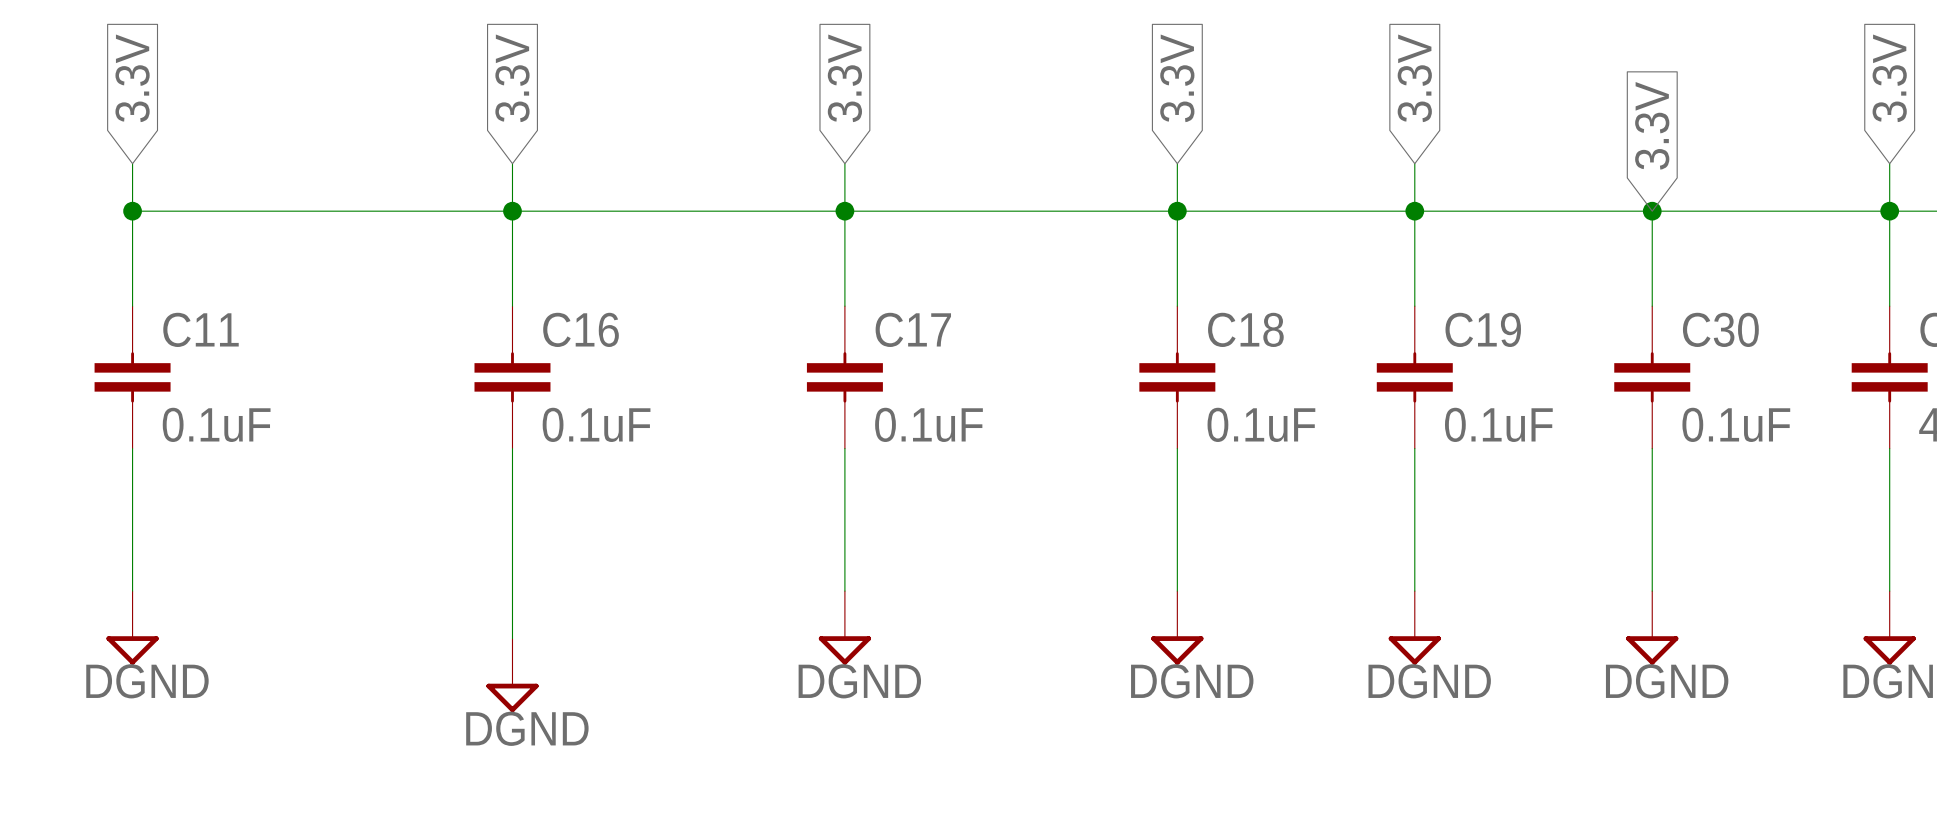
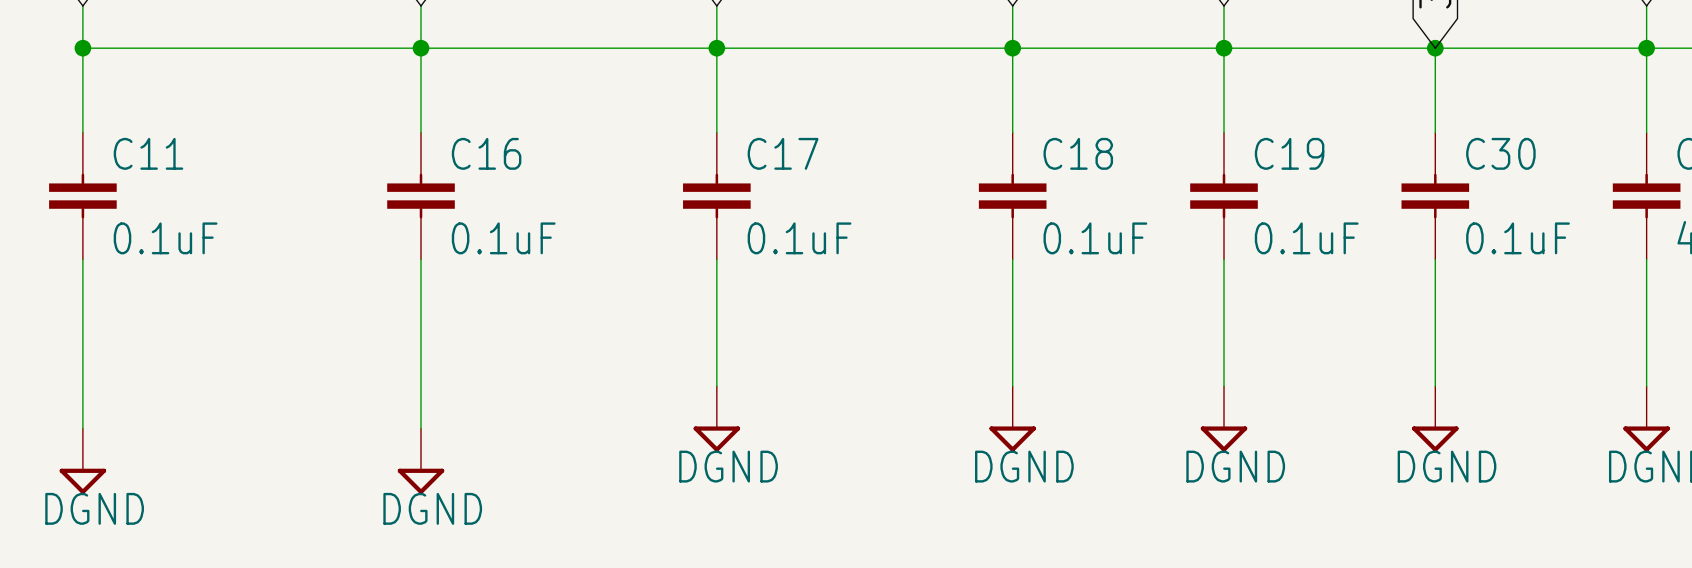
power symbol position: DGND (132, 627) -> DGND (82, 461)

